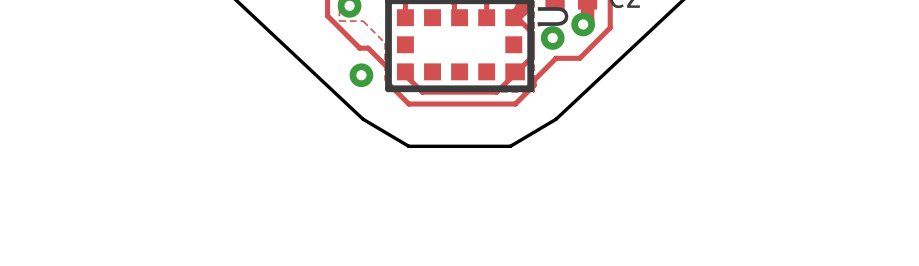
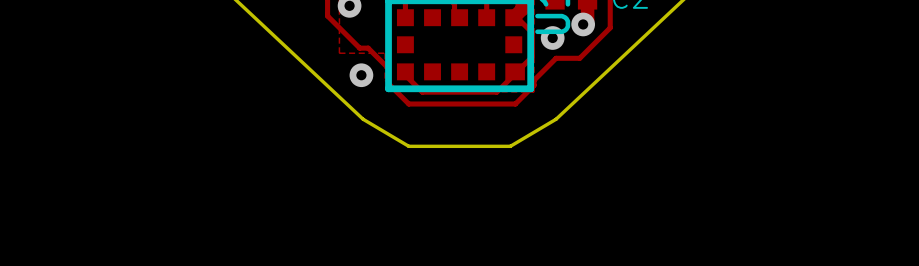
zone outline: (339, 21) (363, 21) (385, 43) (385, 53) -> (339, 21) (339, 53) (385, 53)

